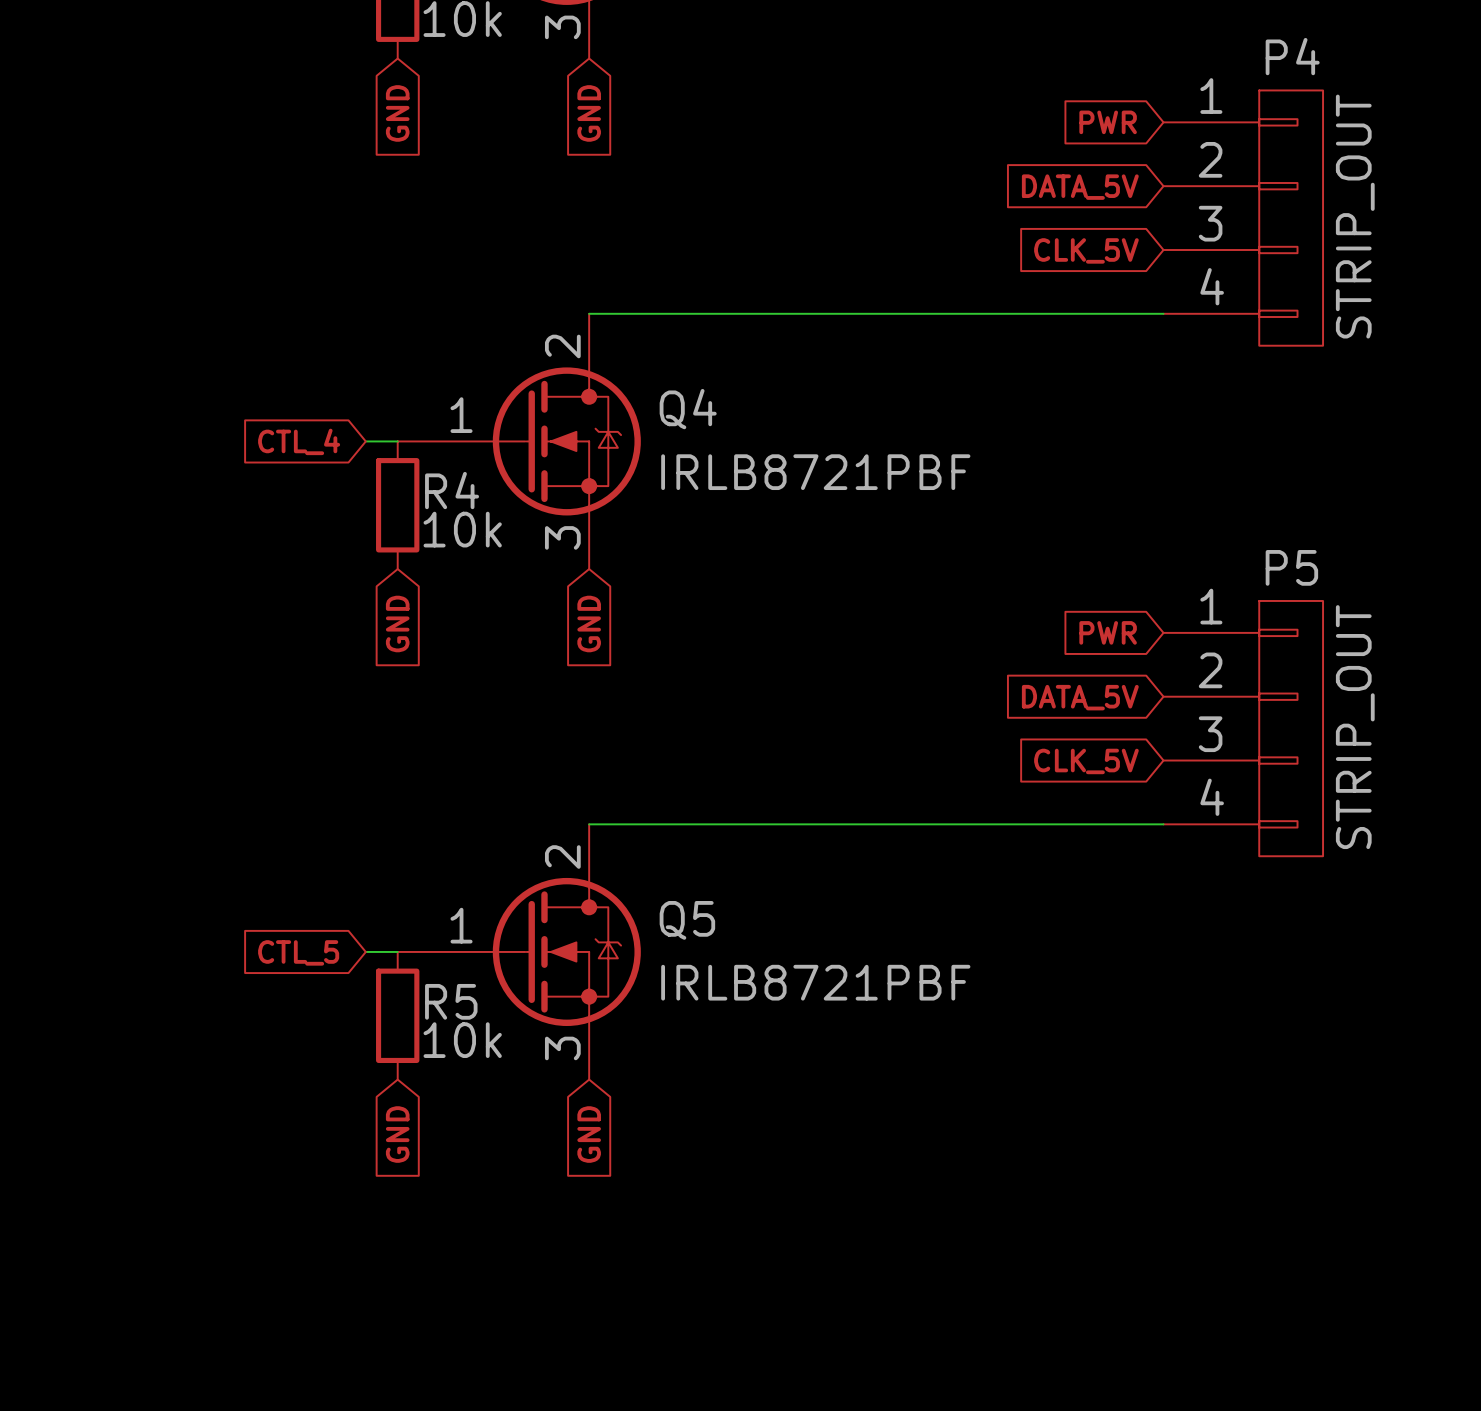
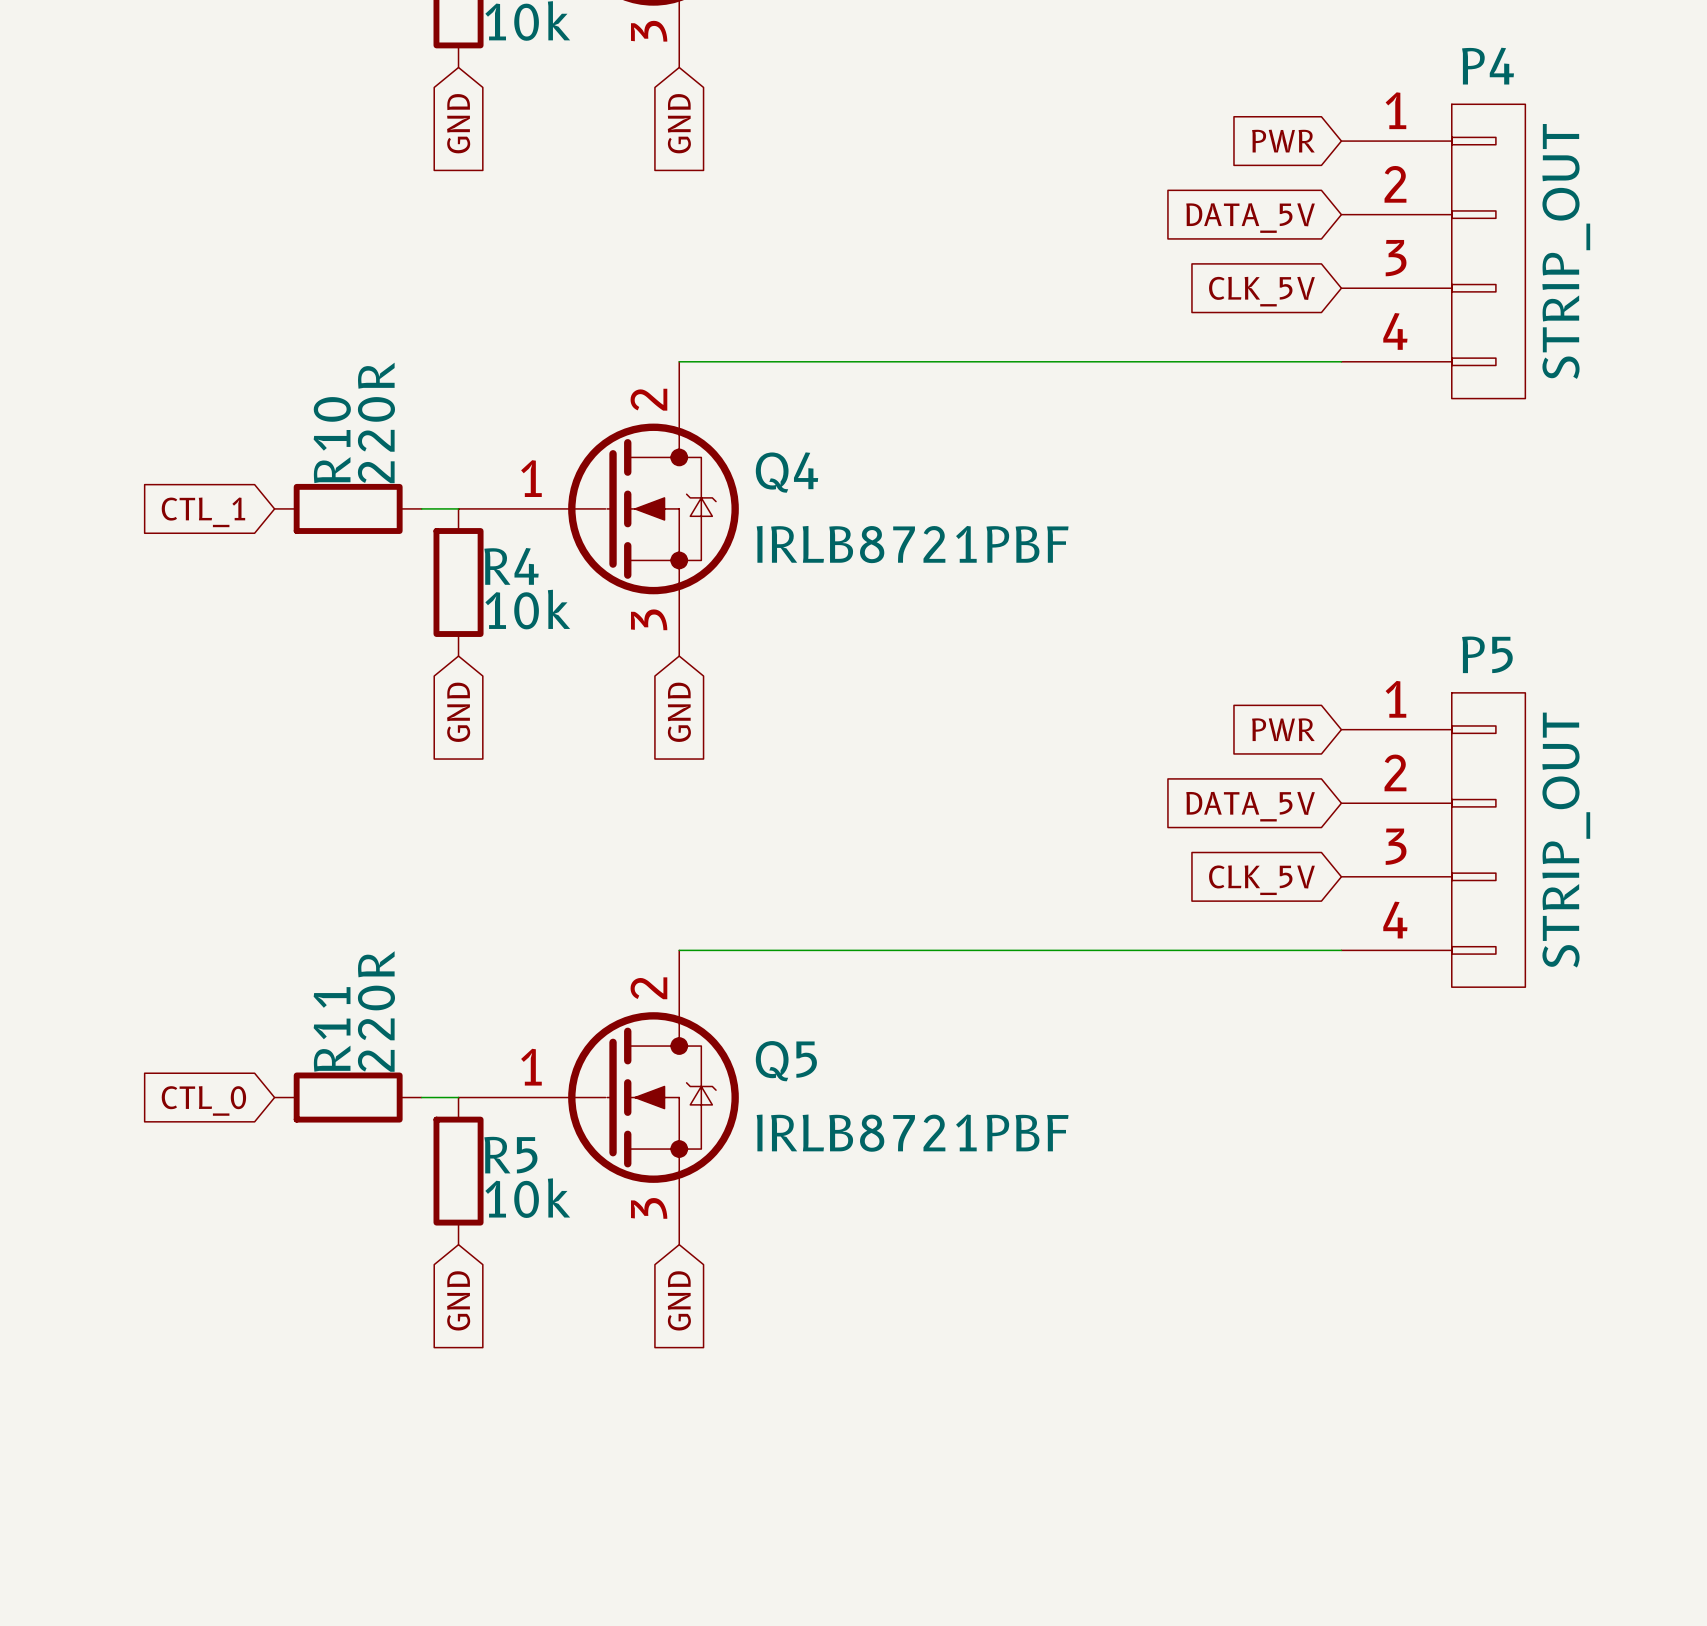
global label: CTL_4 (299, 441) -> CTL_1 (203, 512)
R10: none -> 220R (348, 508)
R11: none -> 220R (348, 1097)
global label: CTL_5 (298, 952) -> CTL_0 (203, 1100)

